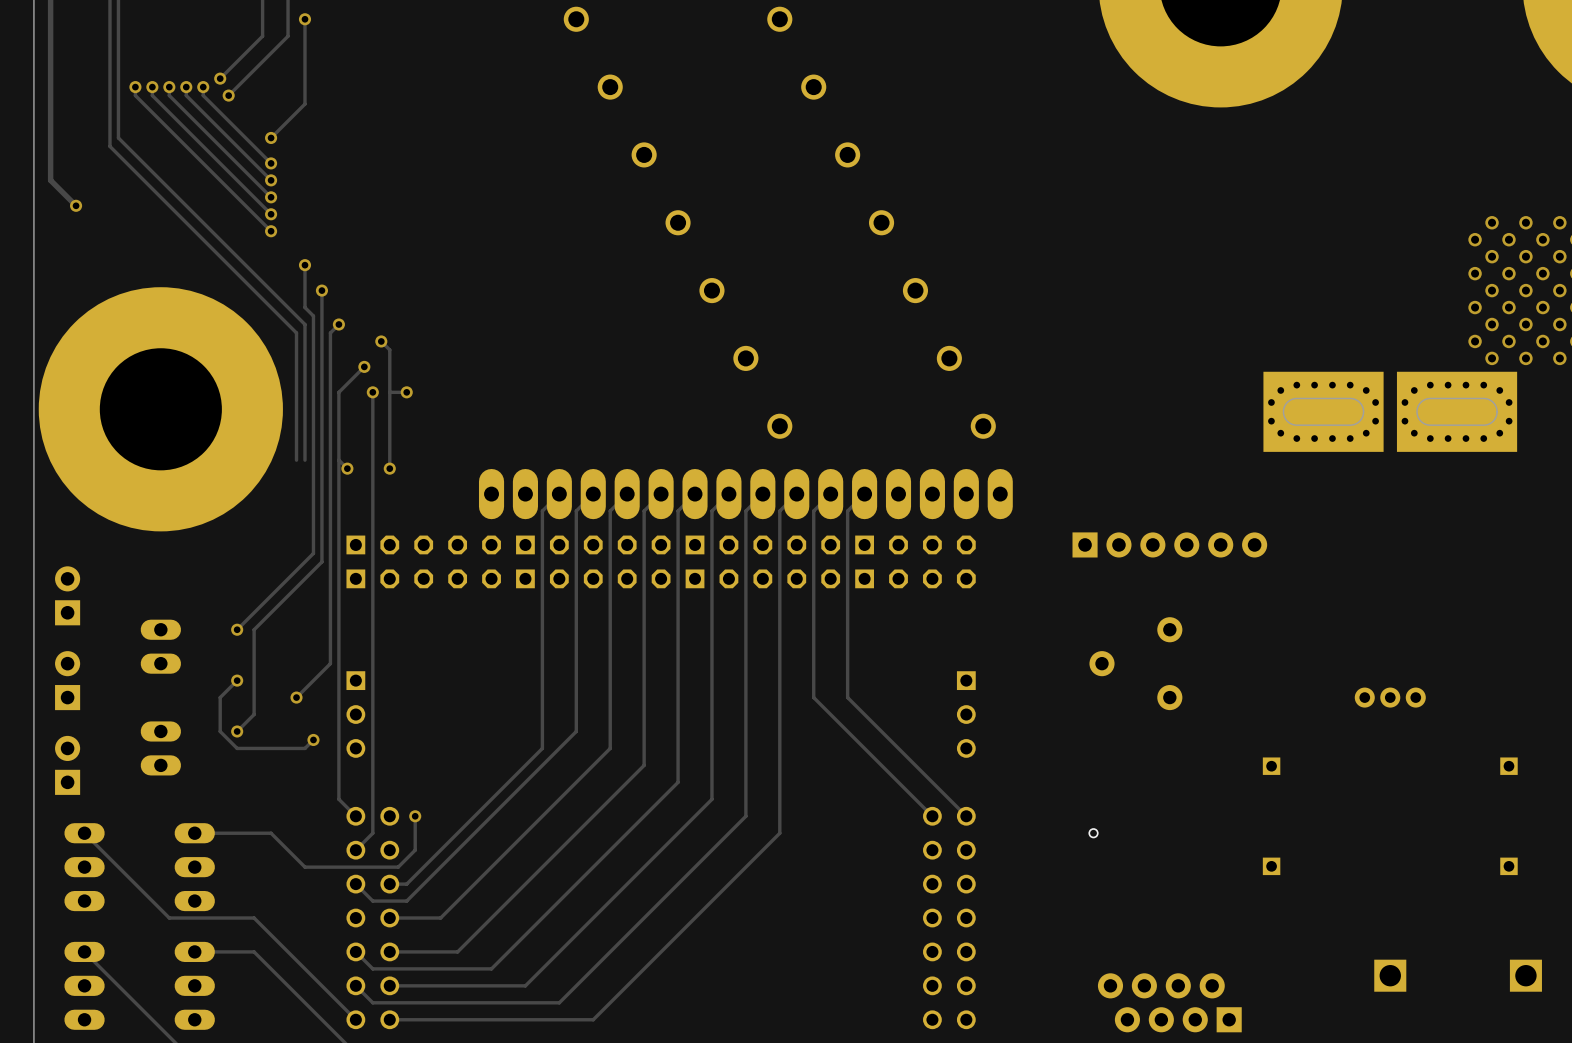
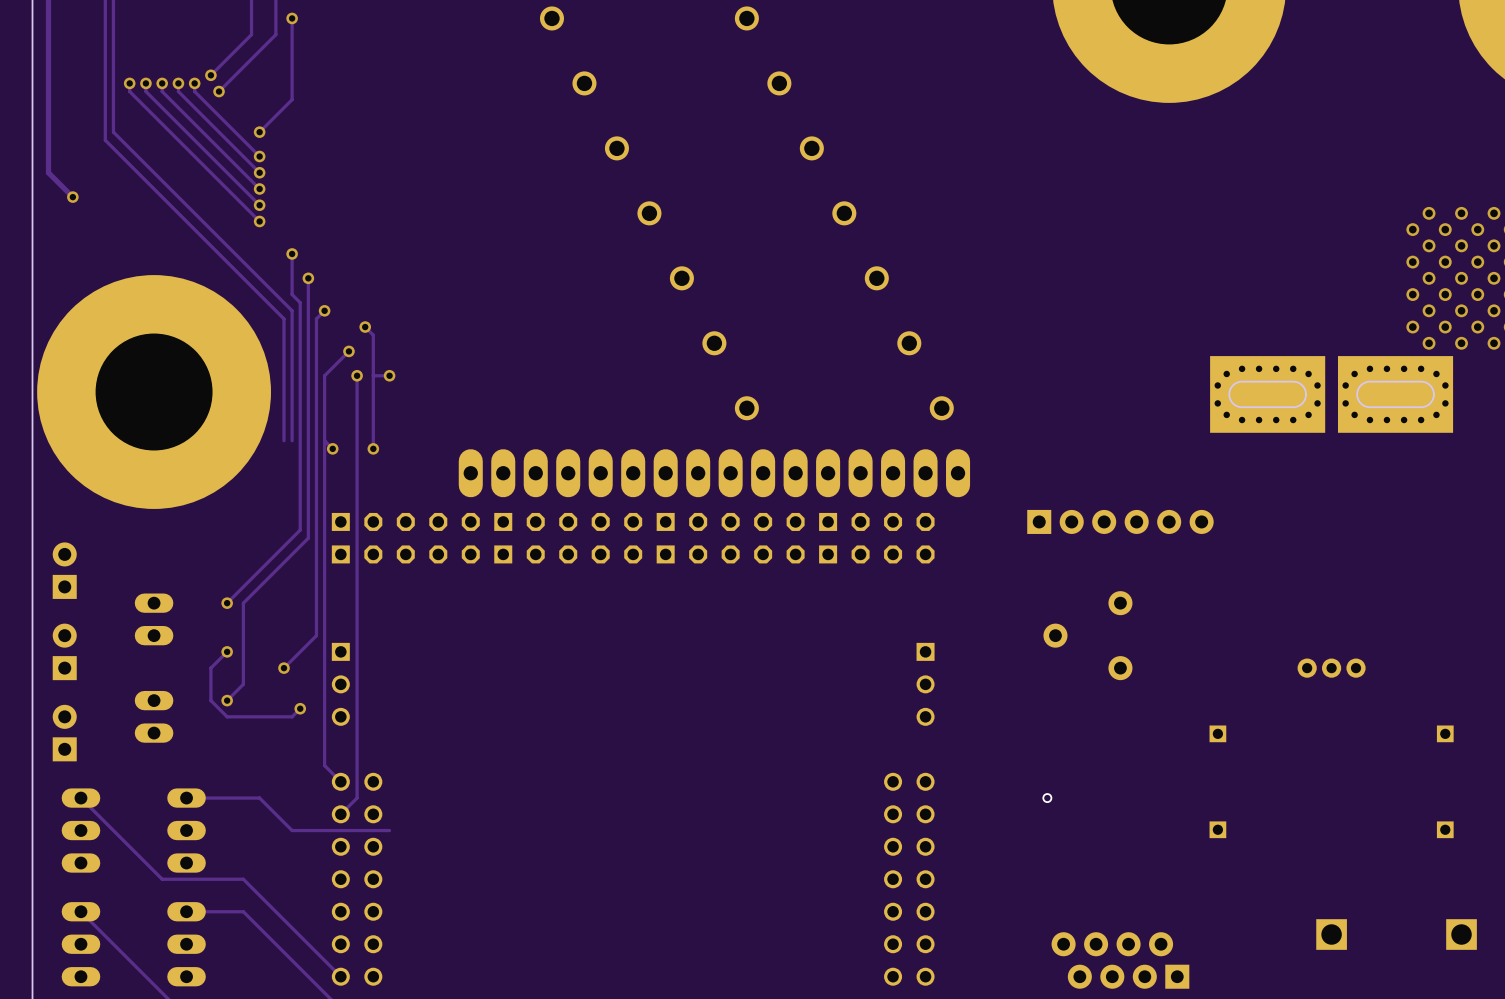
track: (559, 494) (542, 511) (542, 748) (406, 884) (389, 884) -> none
track: (593, 494) (576, 511) (576, 731) (406, 901) (372, 901) (355, 884) -> none
track: (627, 494) (610, 511) (610, 748) (440, 918) (389, 918) -> none
track: (661, 494) (644, 511) (644, 765) (457, 951) (389, 951) -> none
track: (695, 494) (678, 511) (678, 782) (491, 968) (372, 968) (355, 951) -> none
track: (728, 494) (711, 511) (711, 799) (525, 985) (389, 985) -> none
track: (762, 494) (745, 511) (745, 816) (559, 1002) (372, 1002) (355, 985) -> none
track: (796, 494) (779, 511) (779, 833) (593, 1019) (389, 1019) -> none
track: (830, 494) (813, 511) (813, 697) (932, 816) -> none
track: (864, 494) (847, 511) (847, 697) (966, 816) -> none
track: (415, 816) (415, 850) (398, 867) -> (389, 830) (381, 830)
via: (415, 816) -> none

